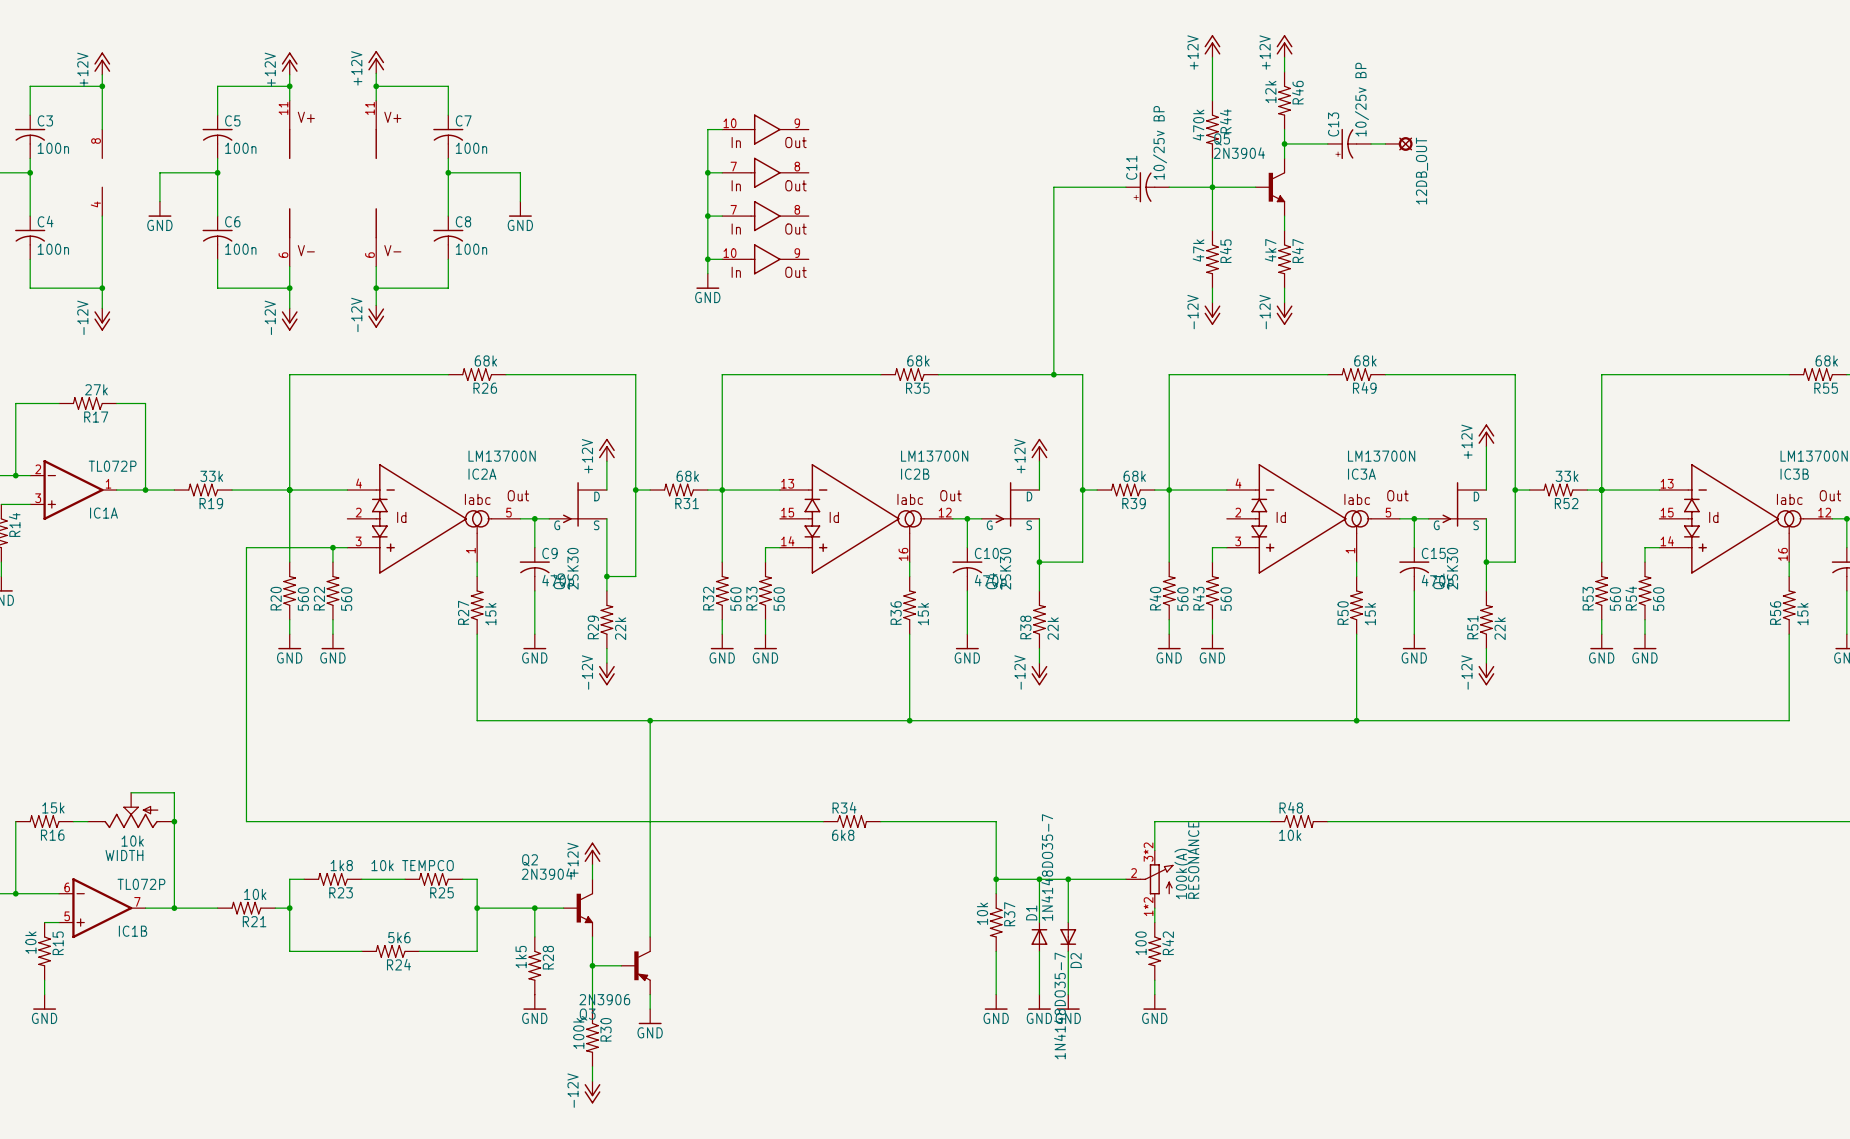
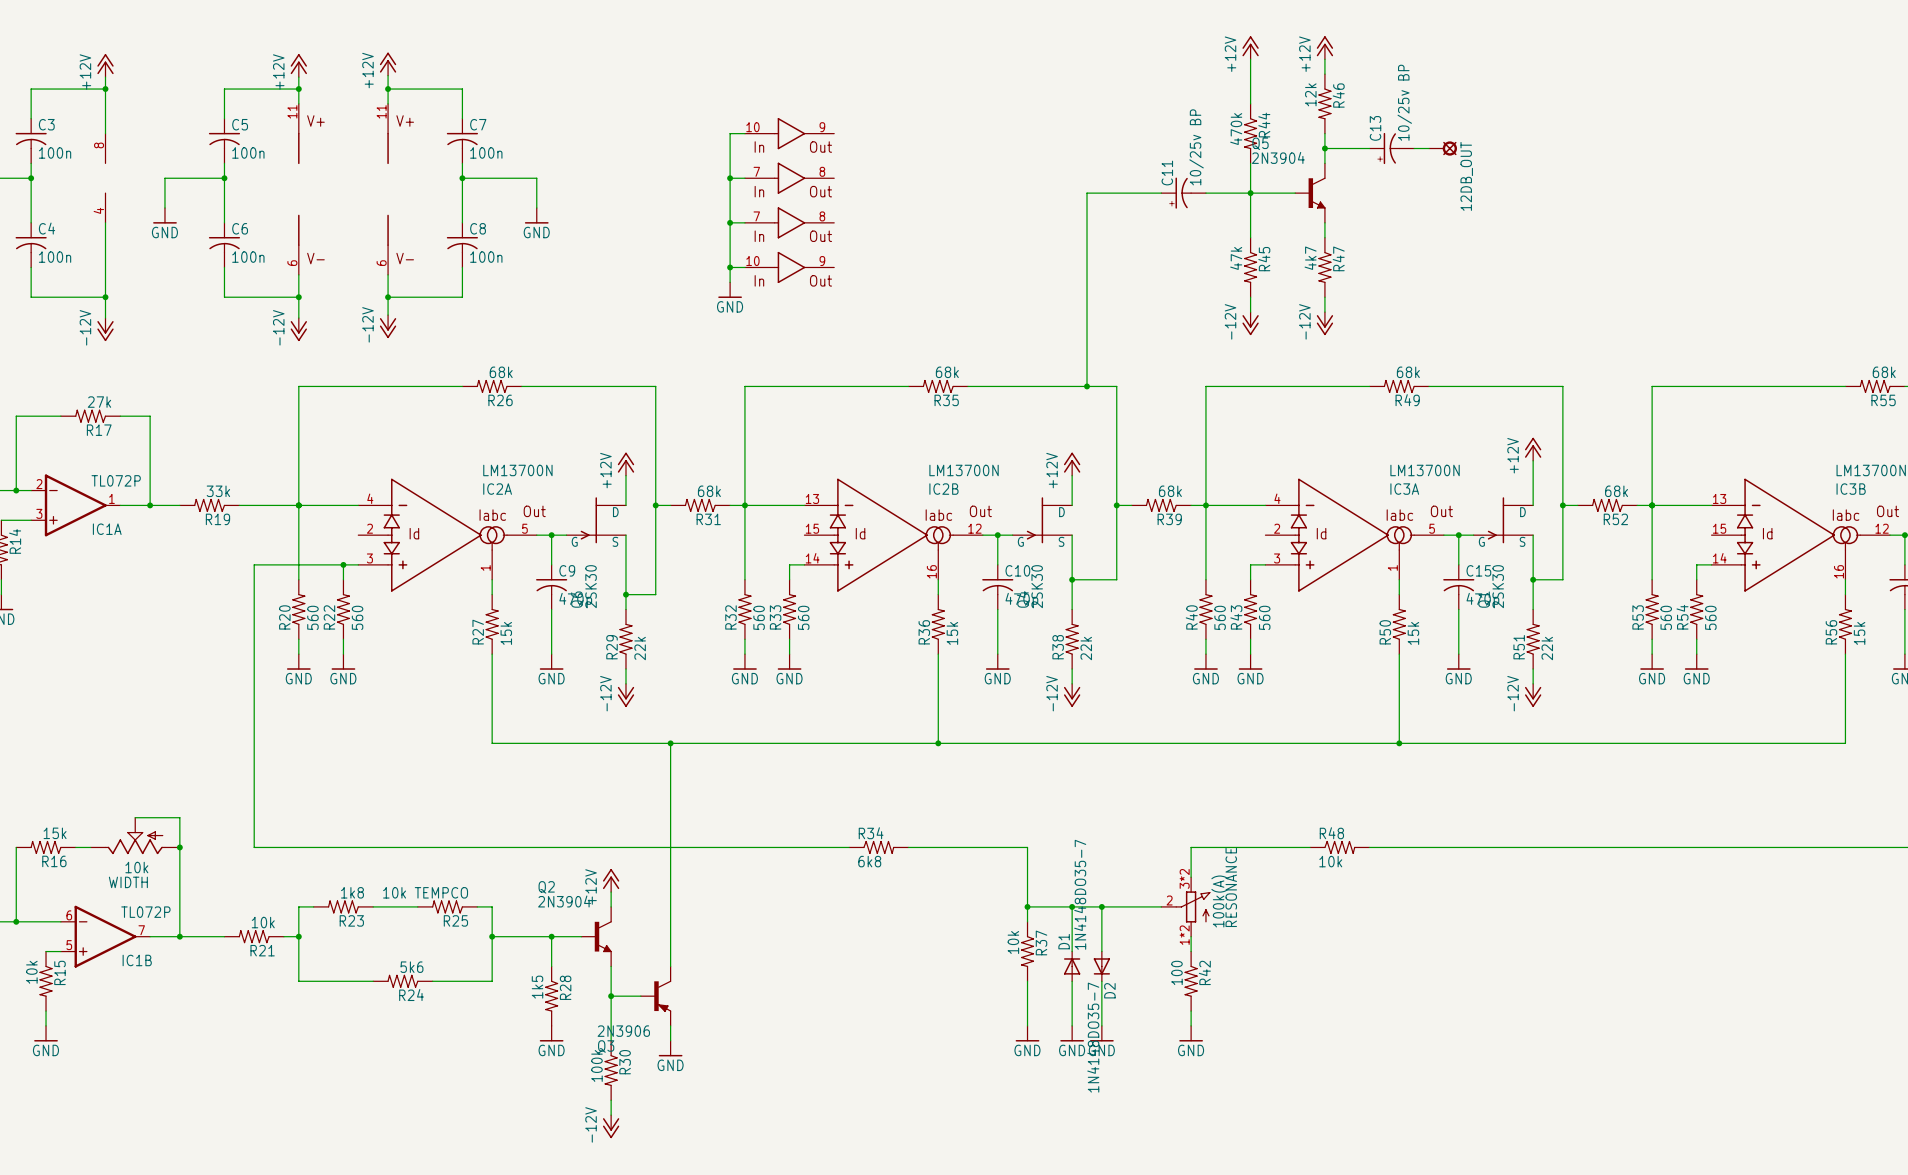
R52 value: 33k (1567, 476) -> 68k (1616, 491)

